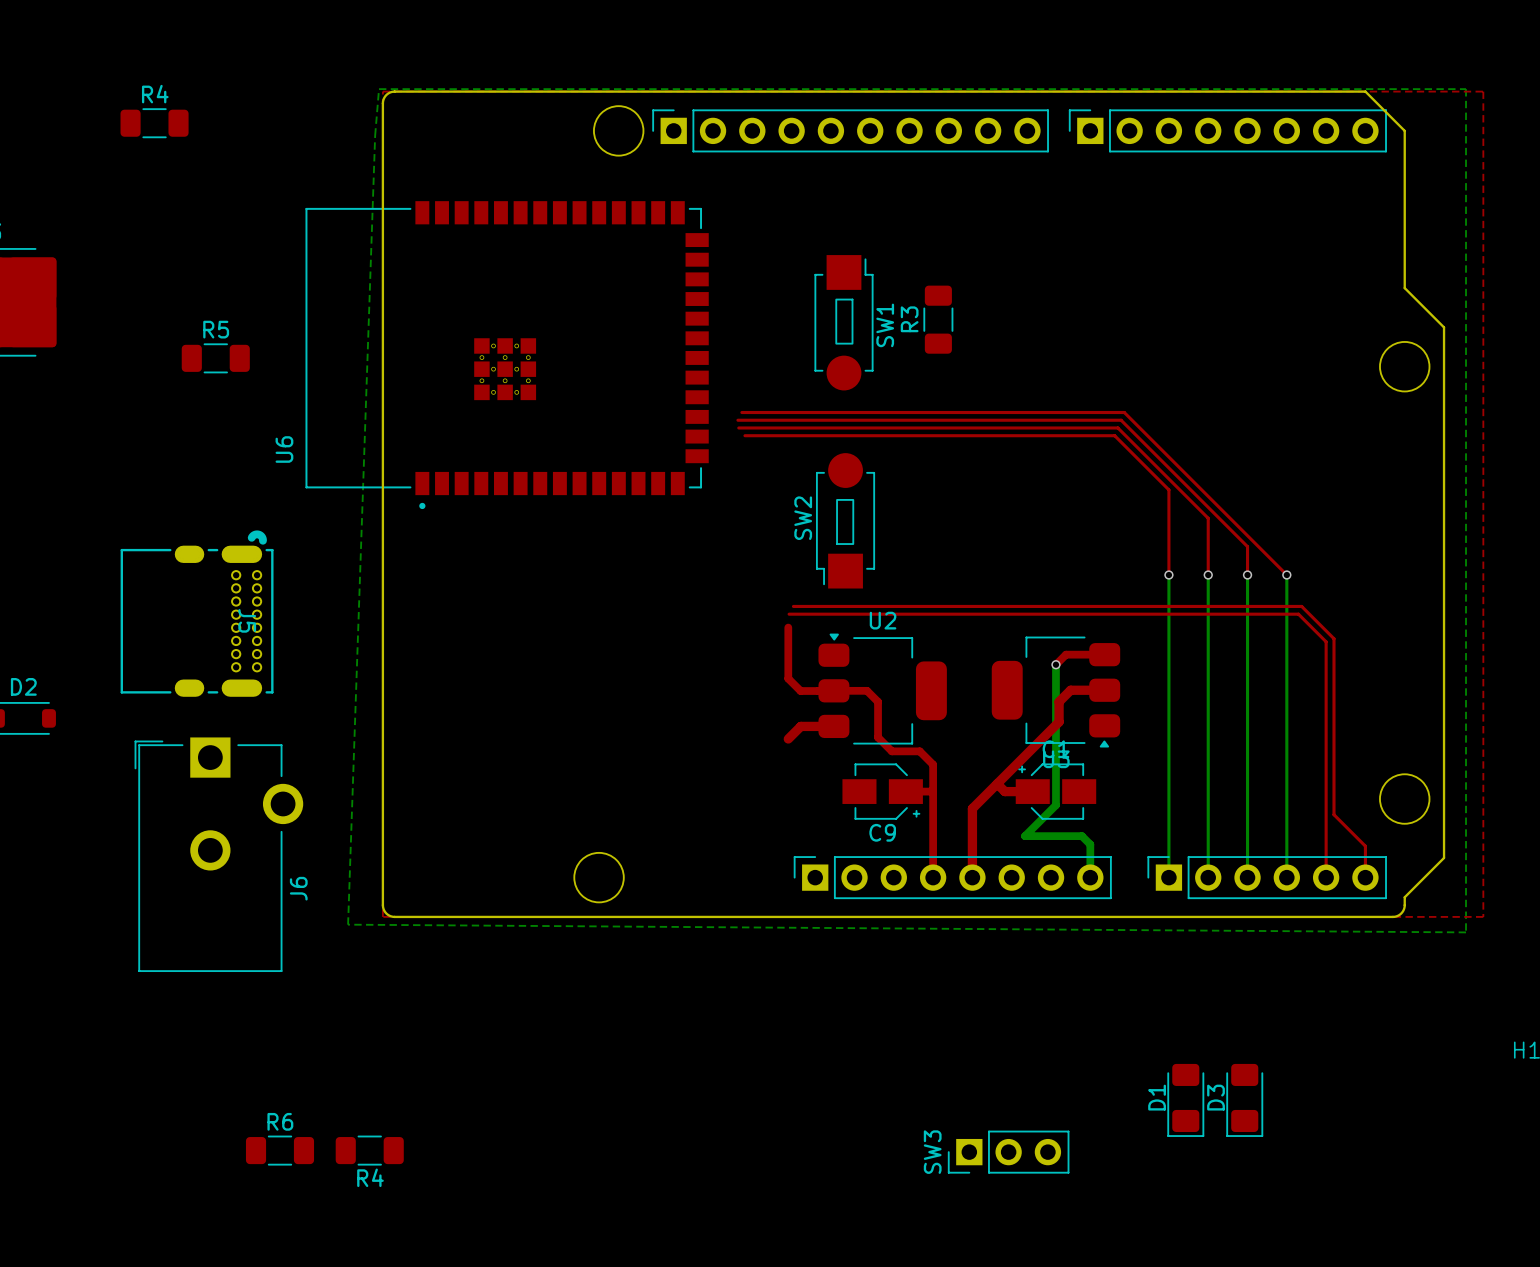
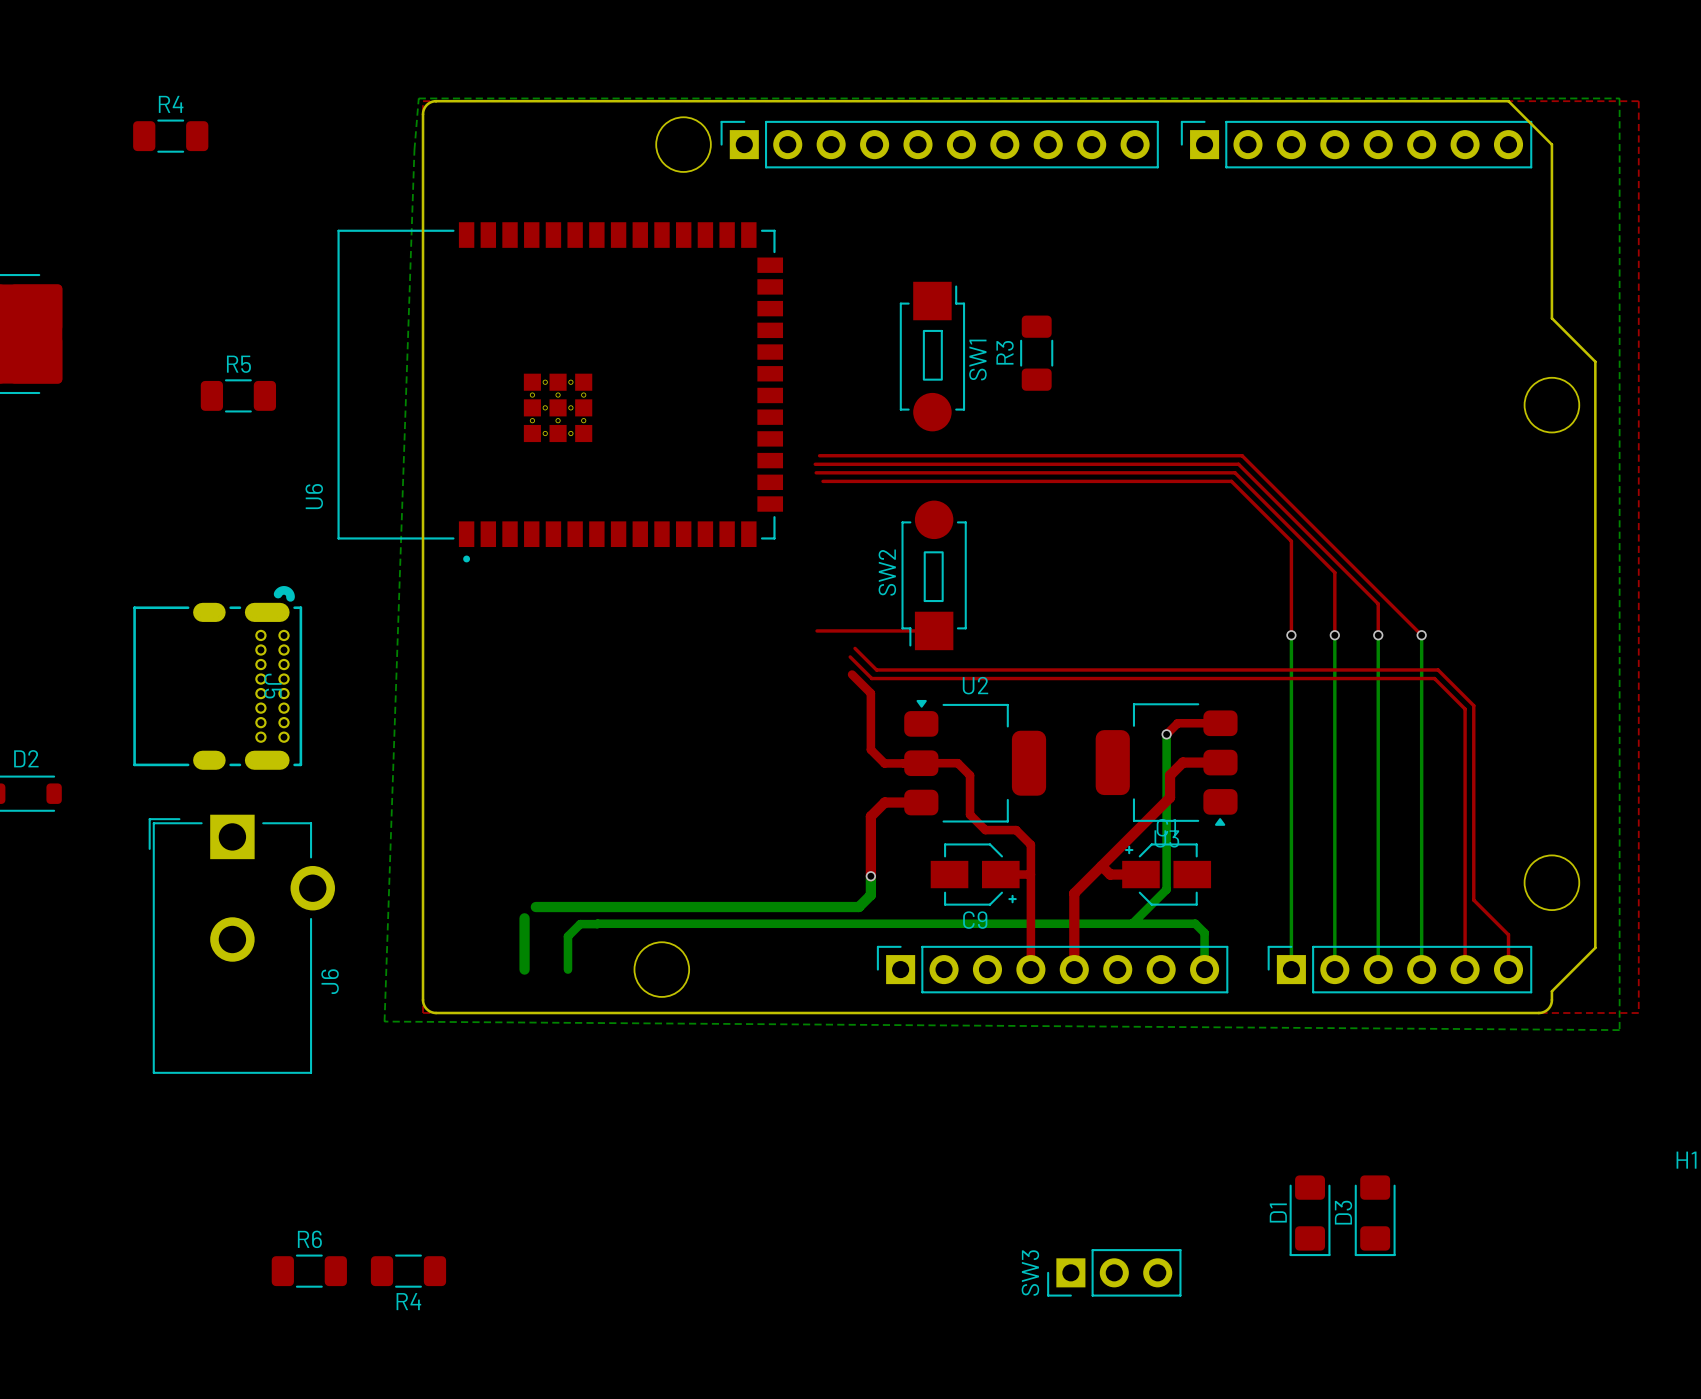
top track: none -> (817, 630) (934, 630)
top track: none -> (855, 648) (876, 669)
top track: none -> (850, 656) (871, 678)
top track: none -> (852, 674) (870, 693)
top track: none -> (870, 816) (870, 876)
bottom track: none -> (870, 876) (870, 895) (858, 907) (535, 907)
via: none -> (870, 876)
bottom track: none -> (524, 918) (524, 969)
bottom track: none -> (1132, 923) (580, 924) (567, 936) (567, 969)

